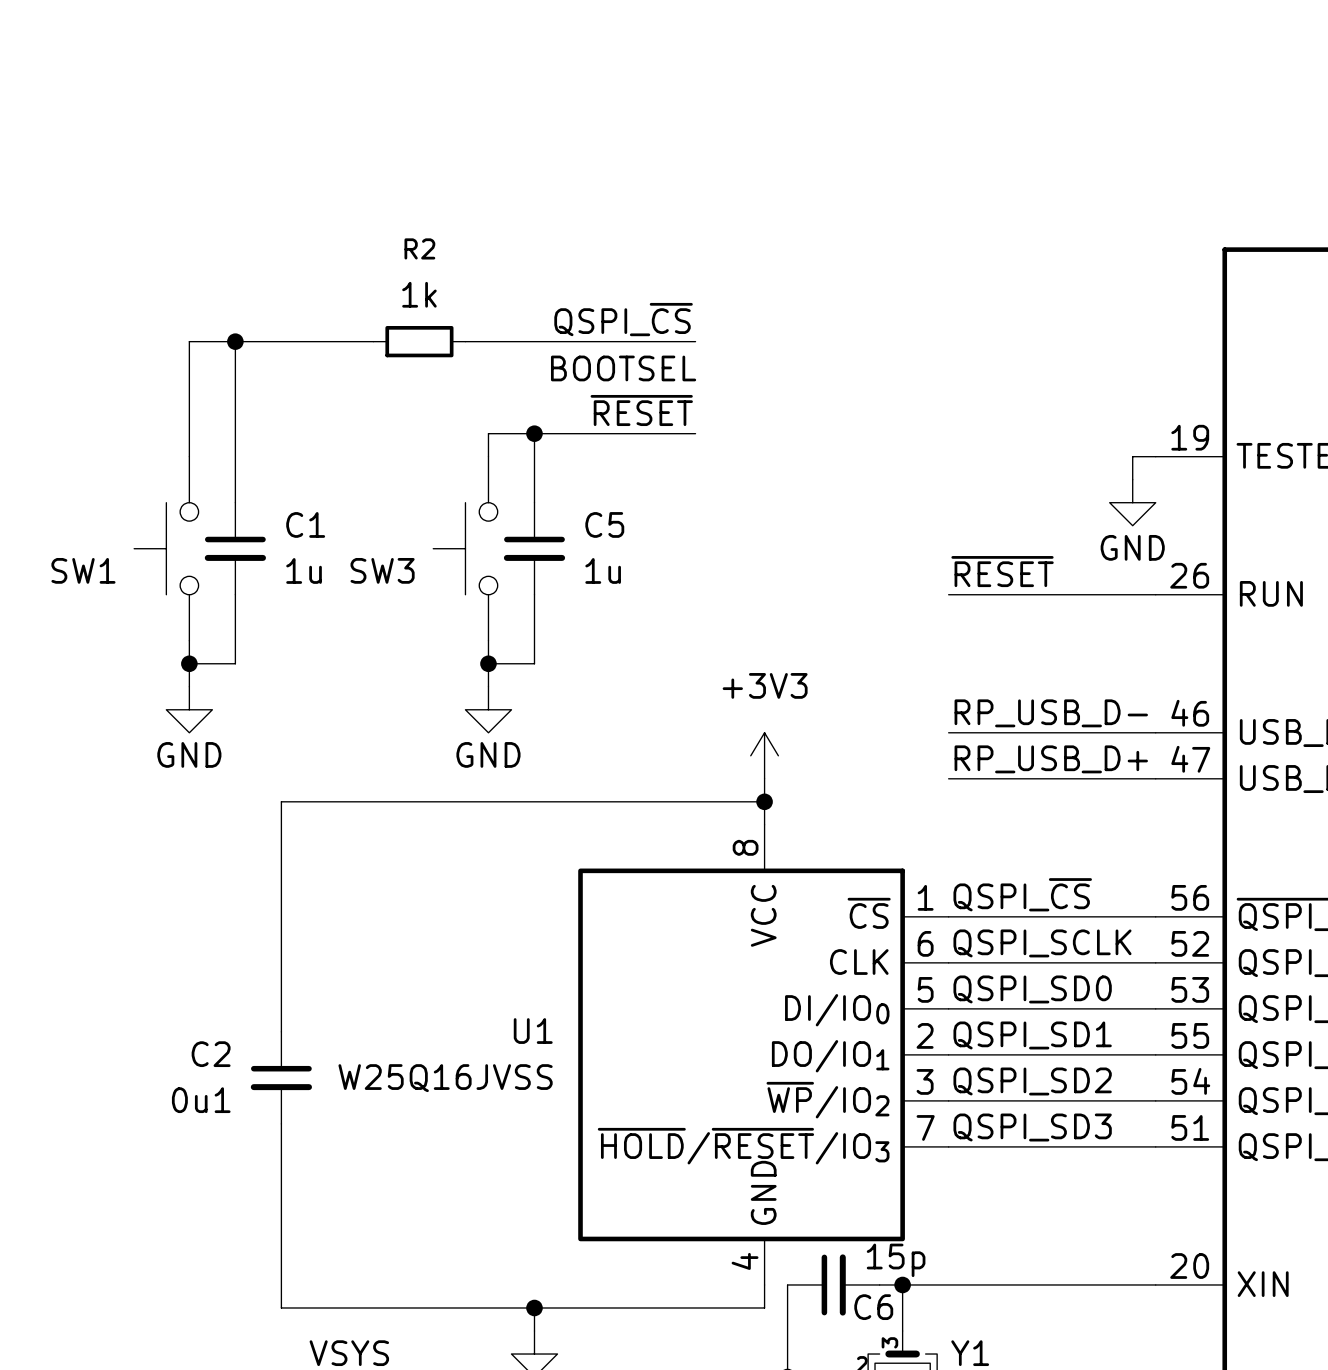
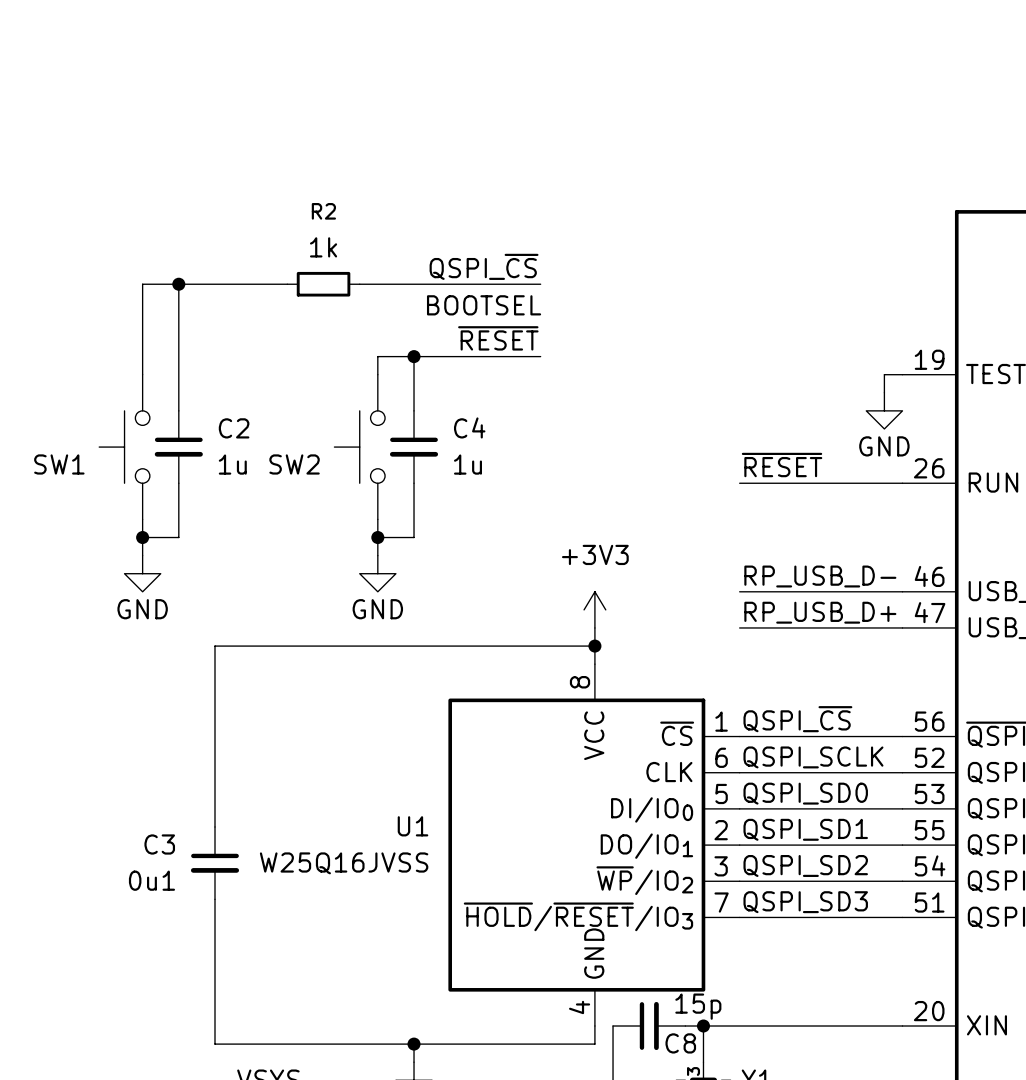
C1 name: C1 (305, 524) -> C2 (234, 428)
C5 name: C5 (604, 524) -> C4 (469, 427)
SW3 name: SW3 (382, 570) -> SW2 (294, 464)
C2 name: C2 (211, 1054) -> C3 (159, 844)
C6 name: C6 (873, 1307) -> C8 (680, 1043)

